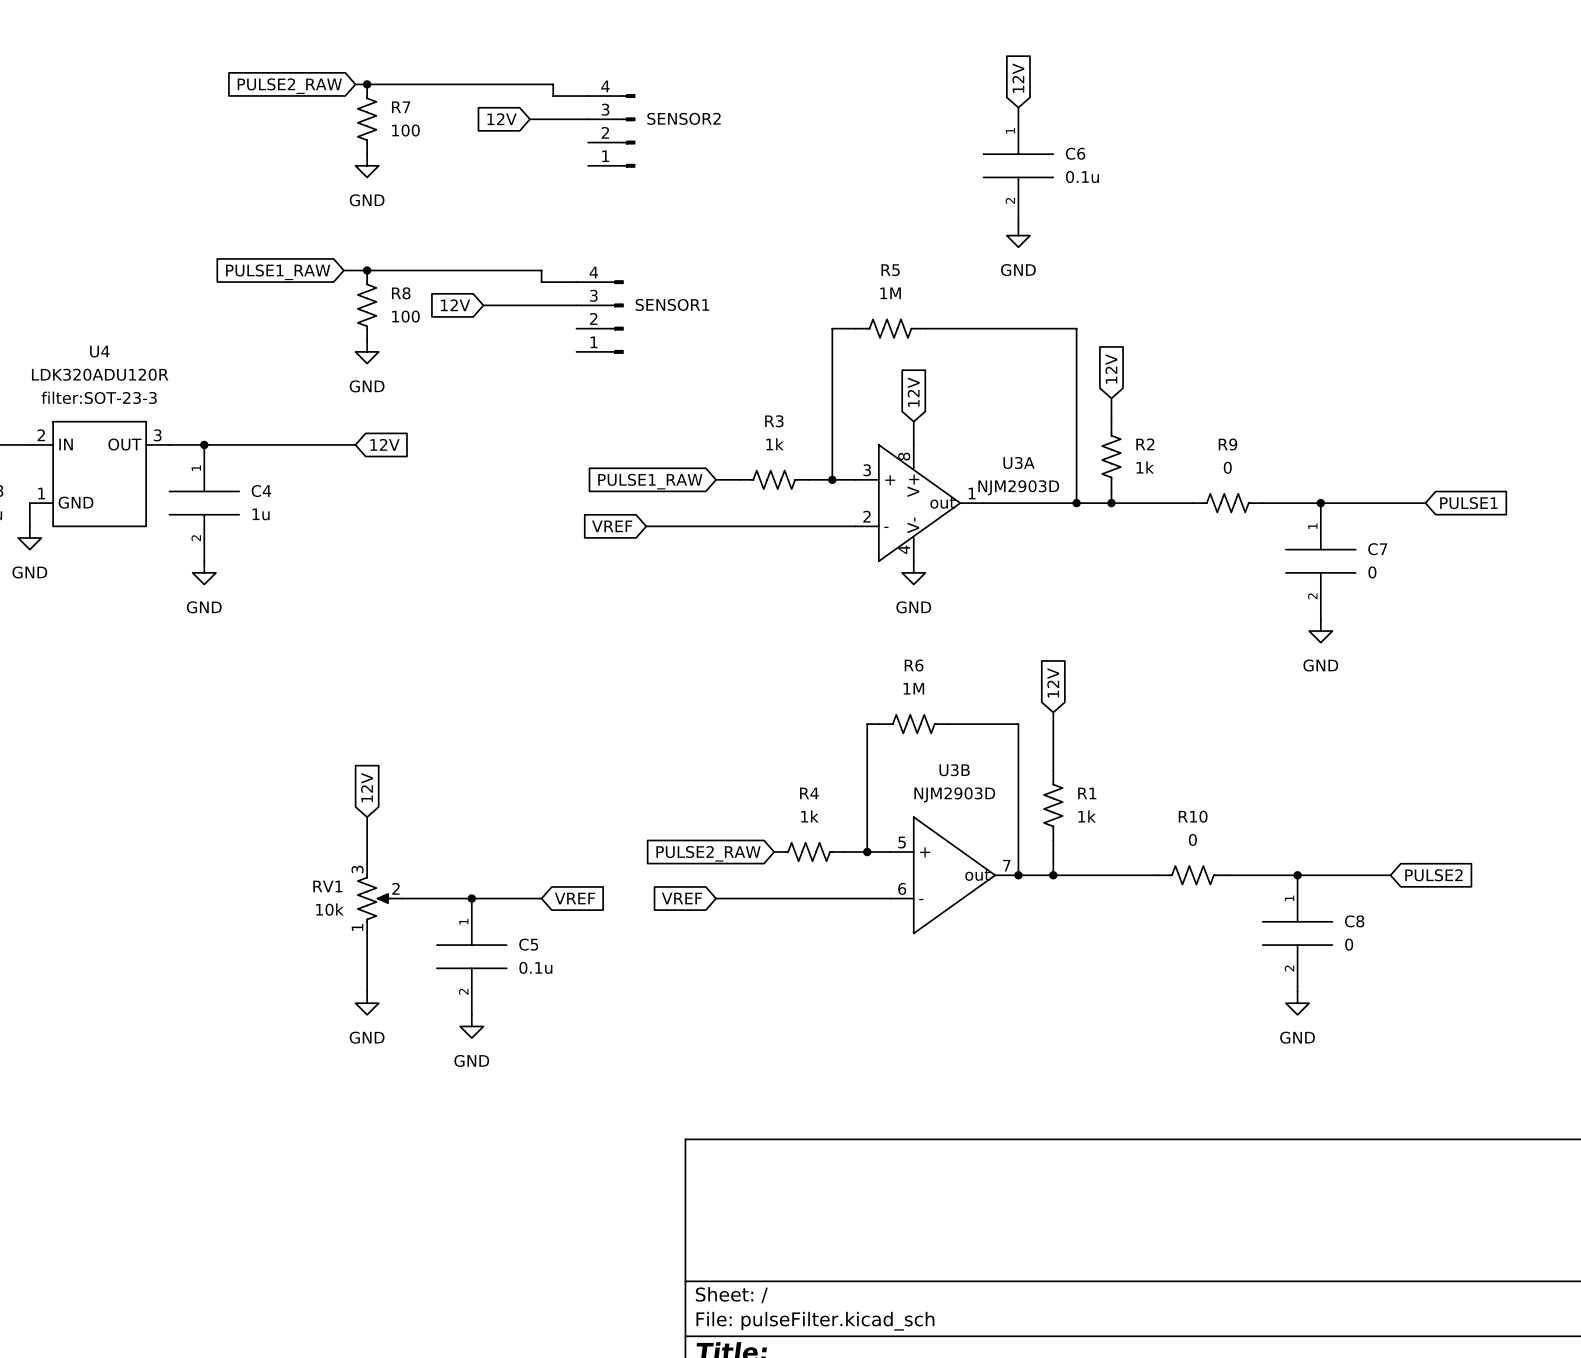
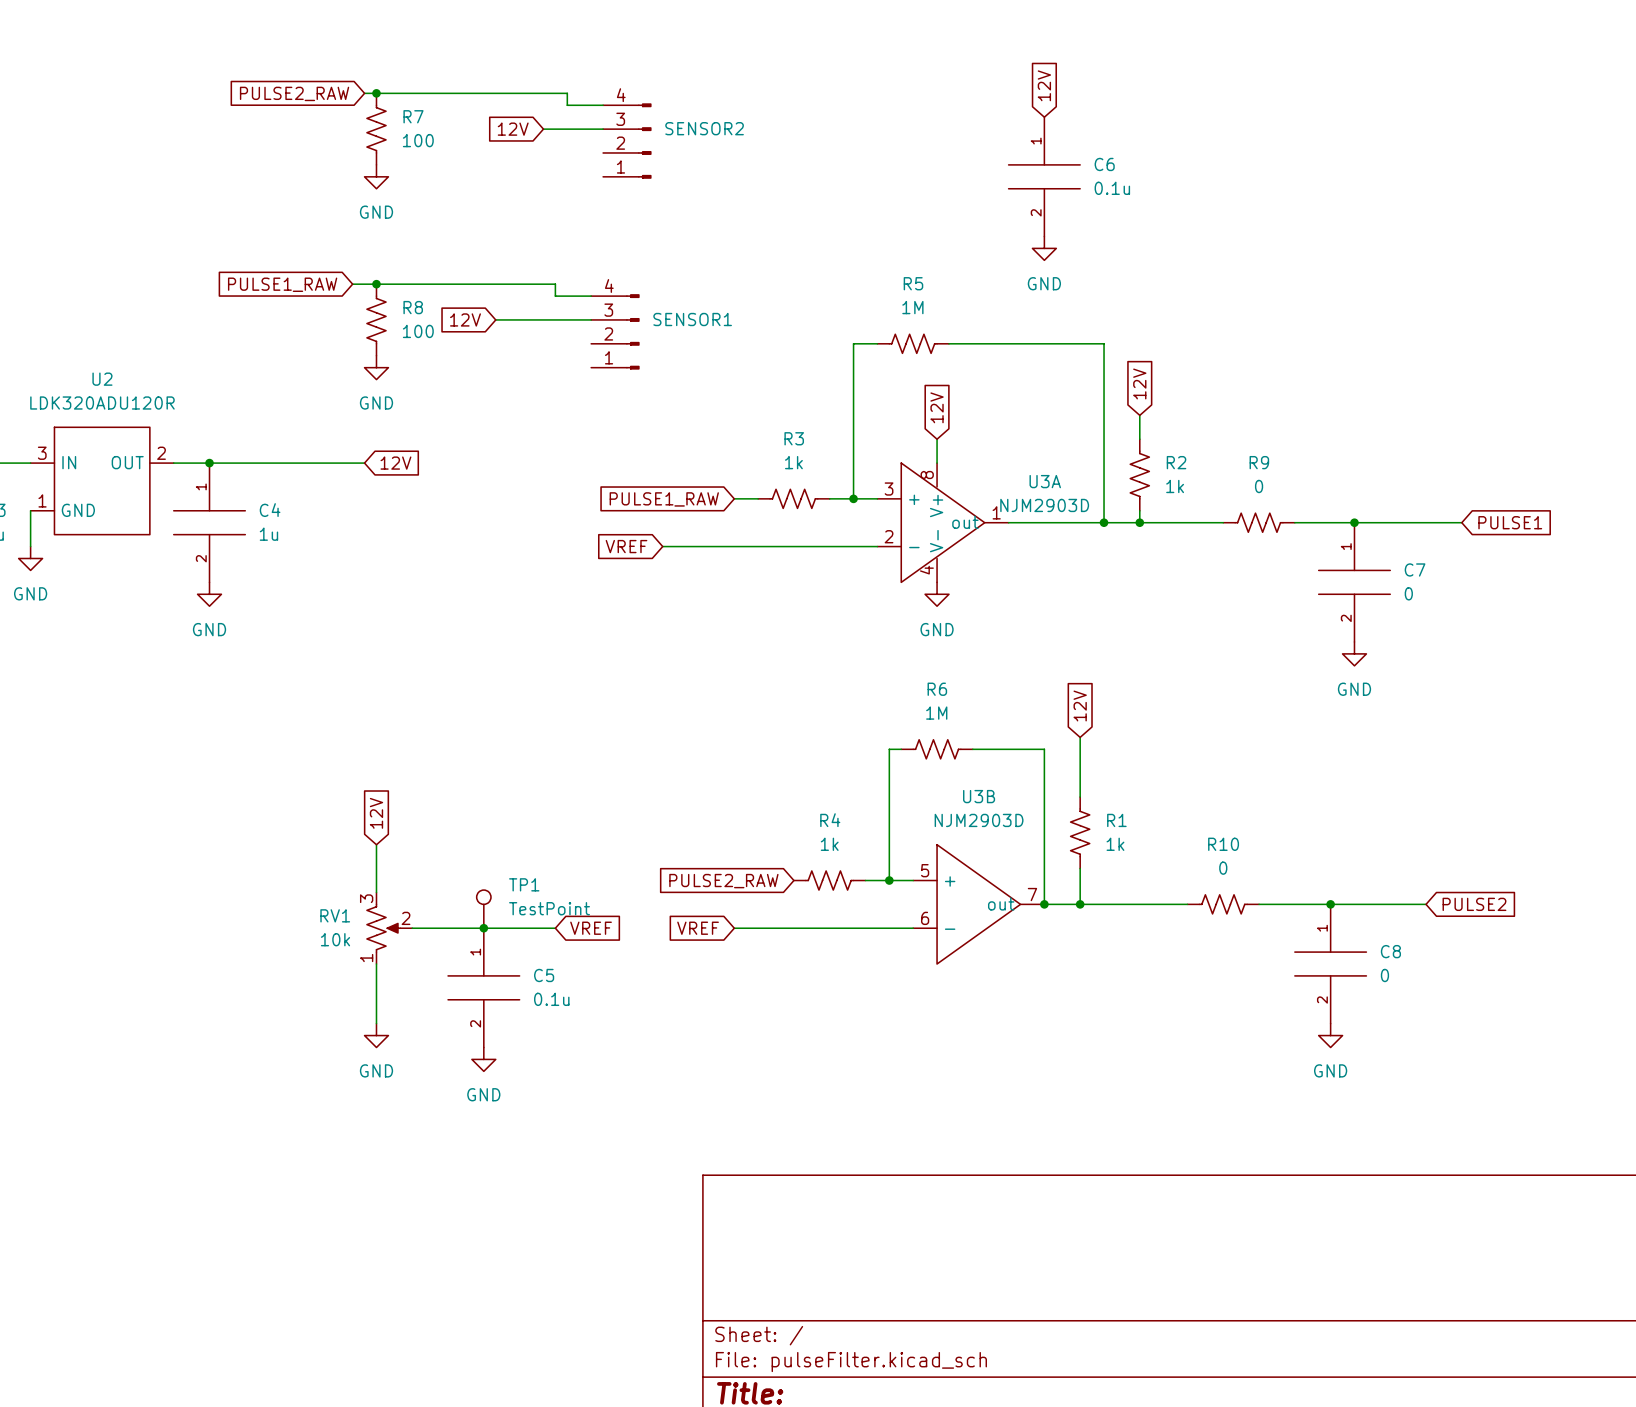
U2: none -> LDK320ADU120R (102, 480)
U4: LDK320ADU120R (99, 474) -> none
wire: none -> (30, 510) (30, 522)
TP1: none -> TestPoint (483, 909)

